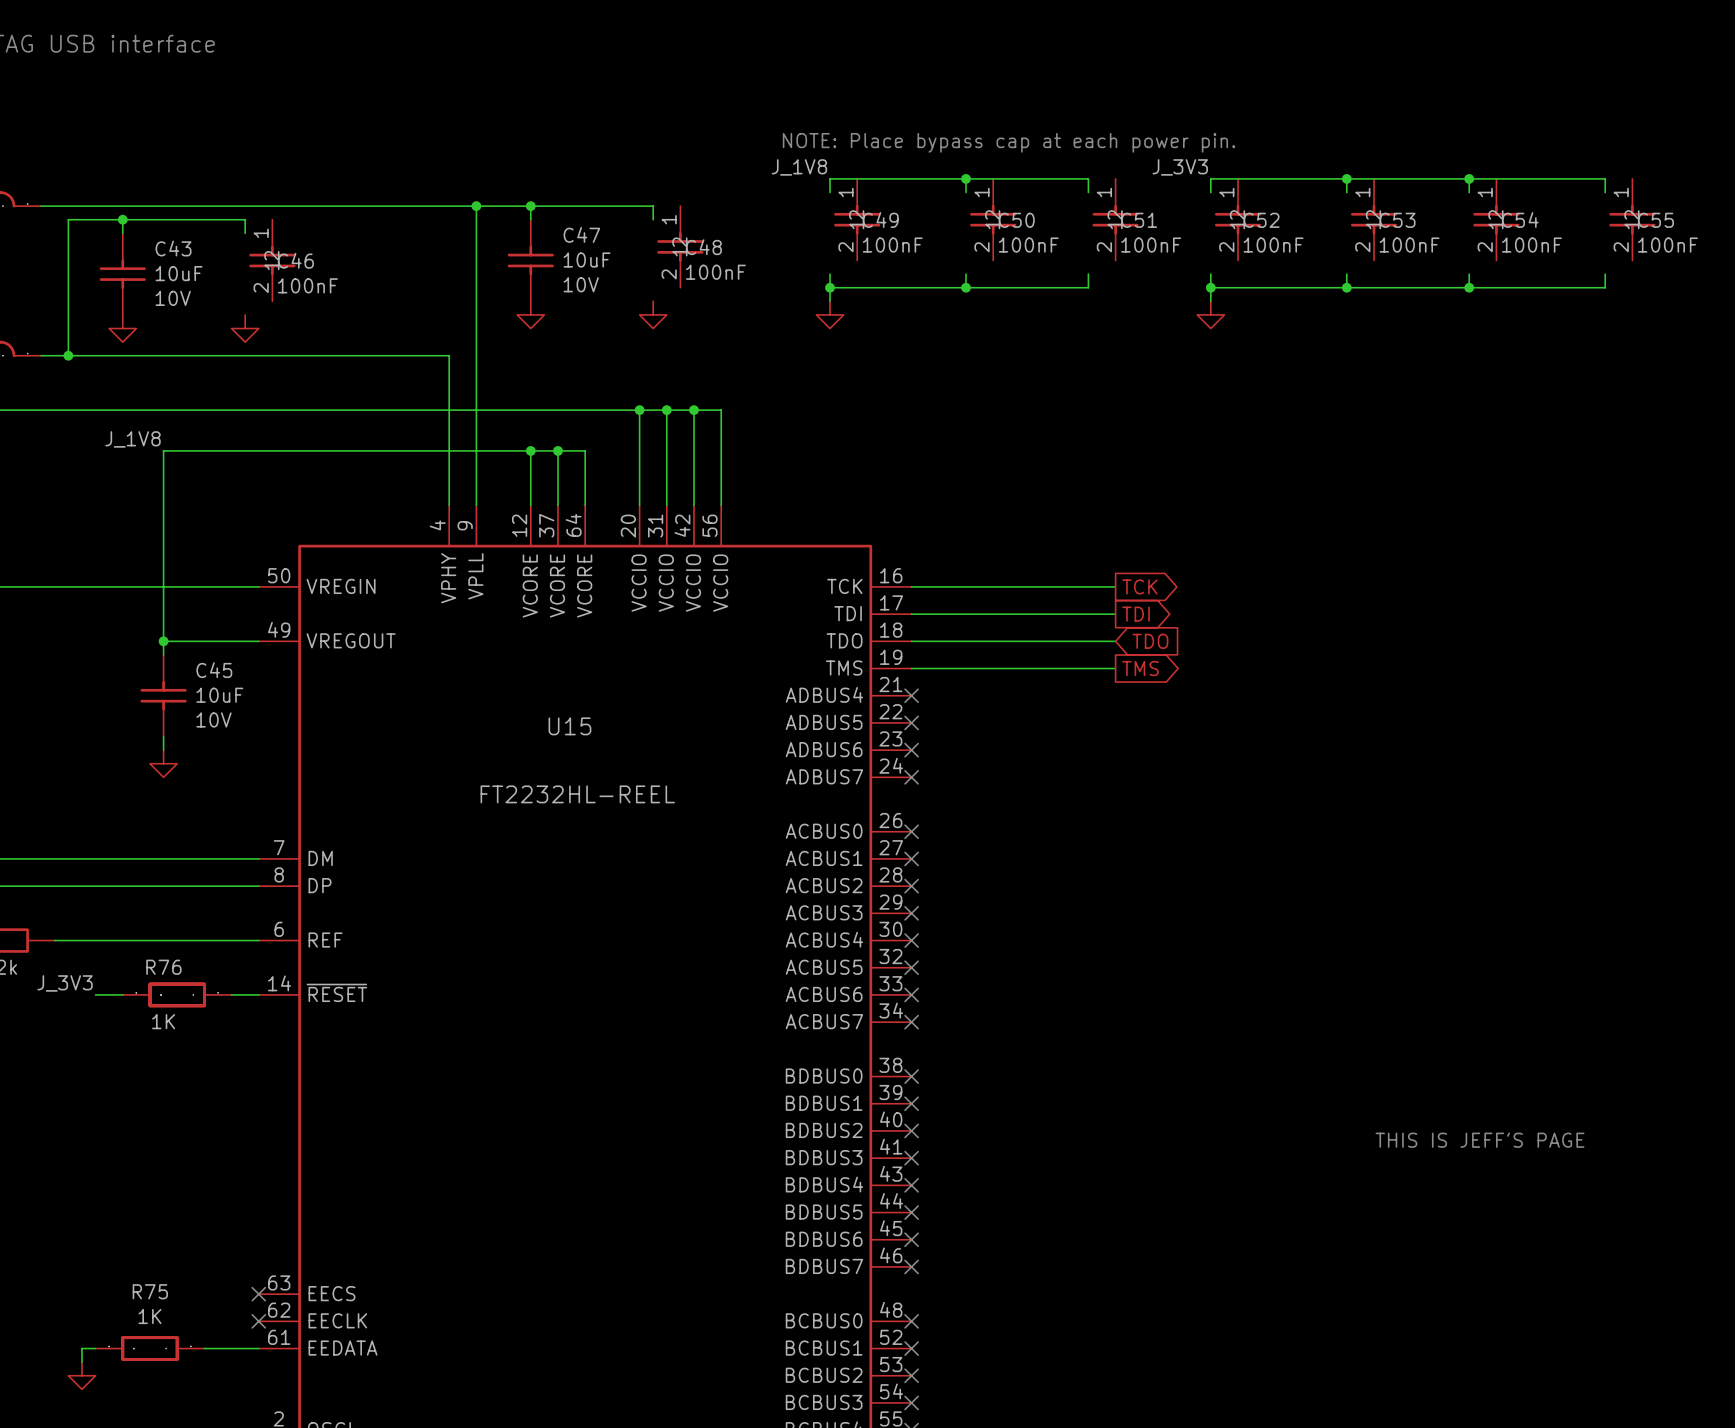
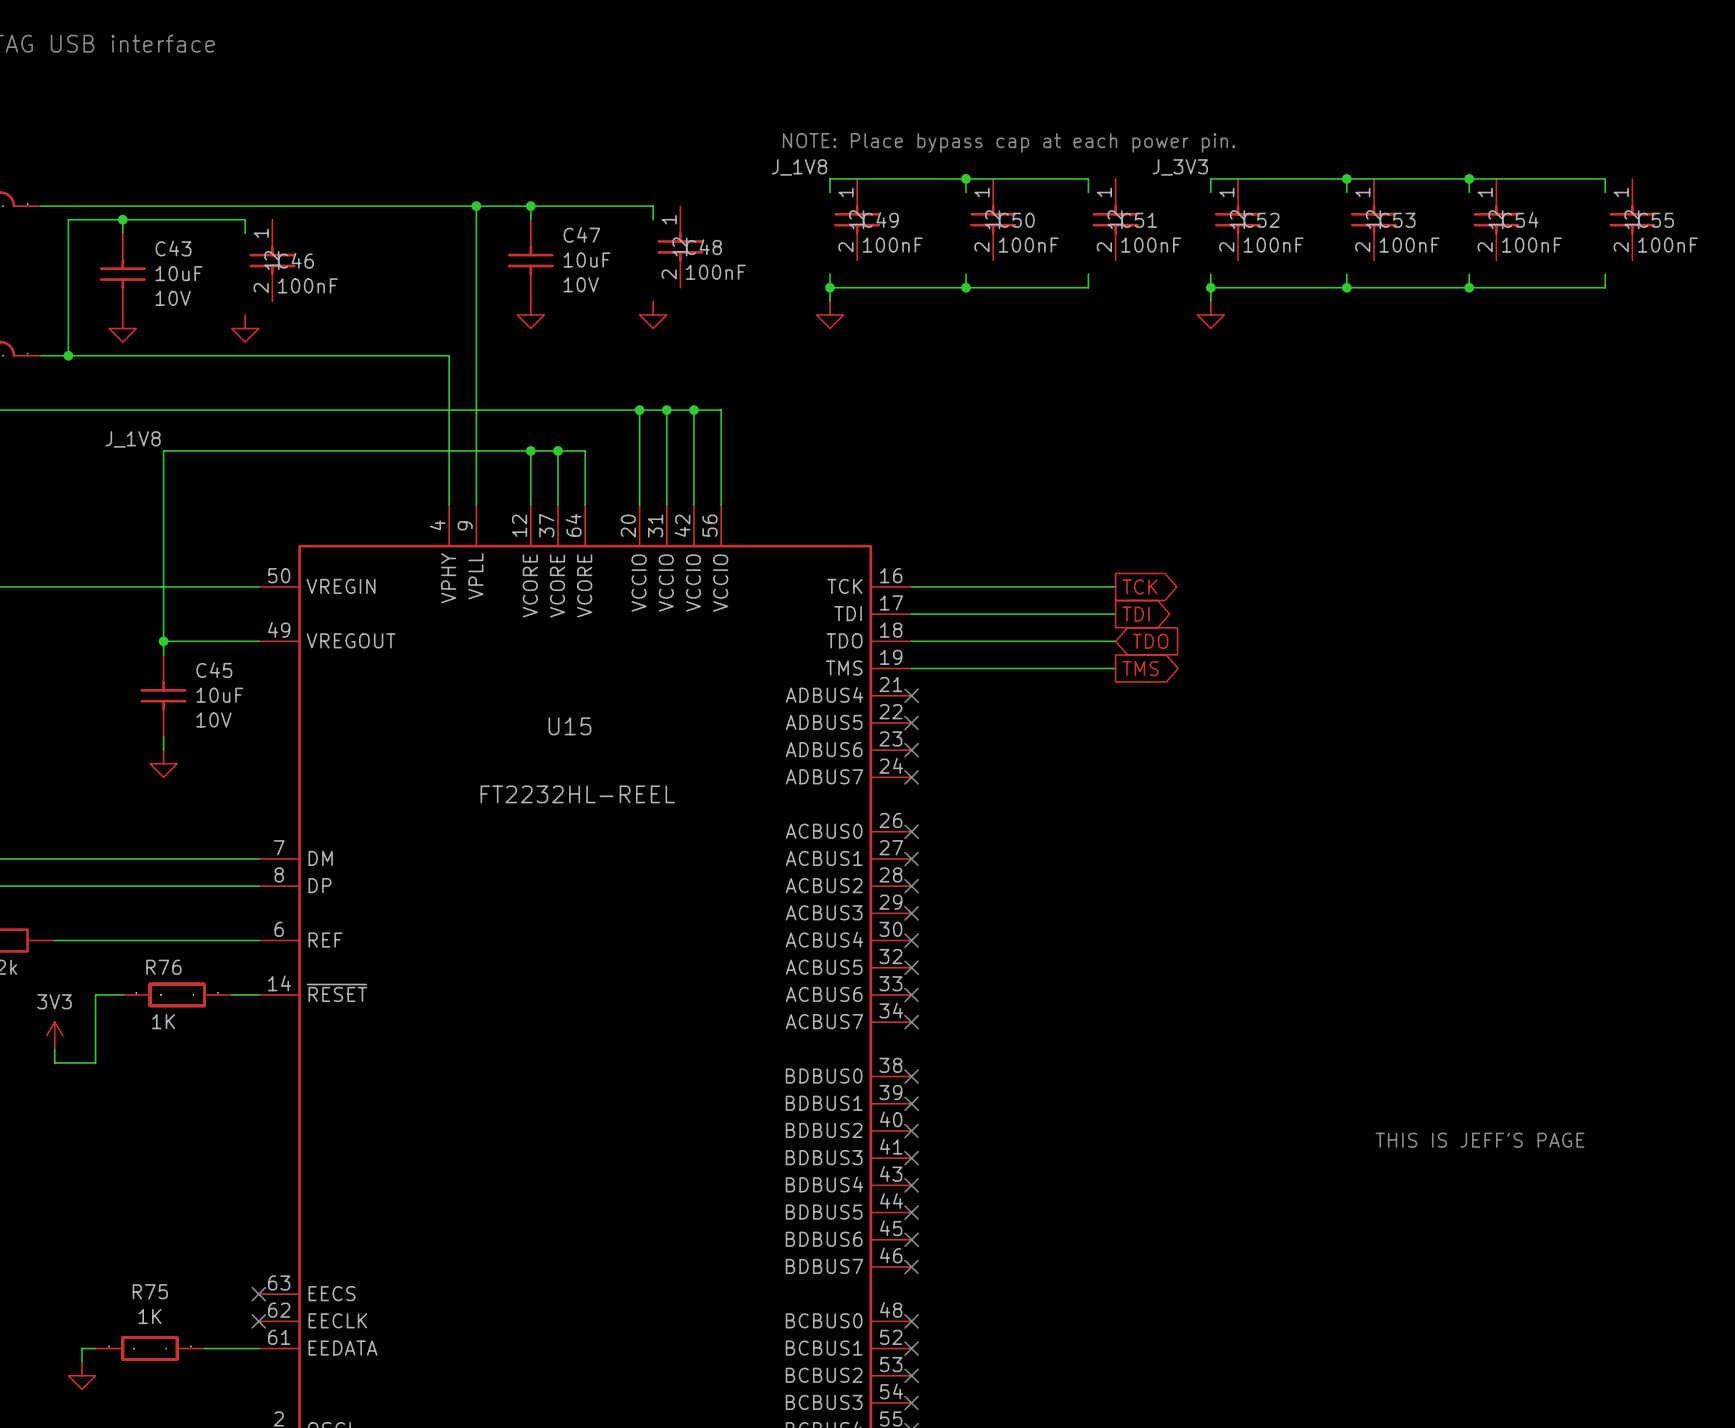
label: J_3V3 (65, 983) -> none
wire: none -> (95, 994) (95, 1062) (54, 1062) (54, 1049)
power symbol: none -> 3V3 (54, 1035)

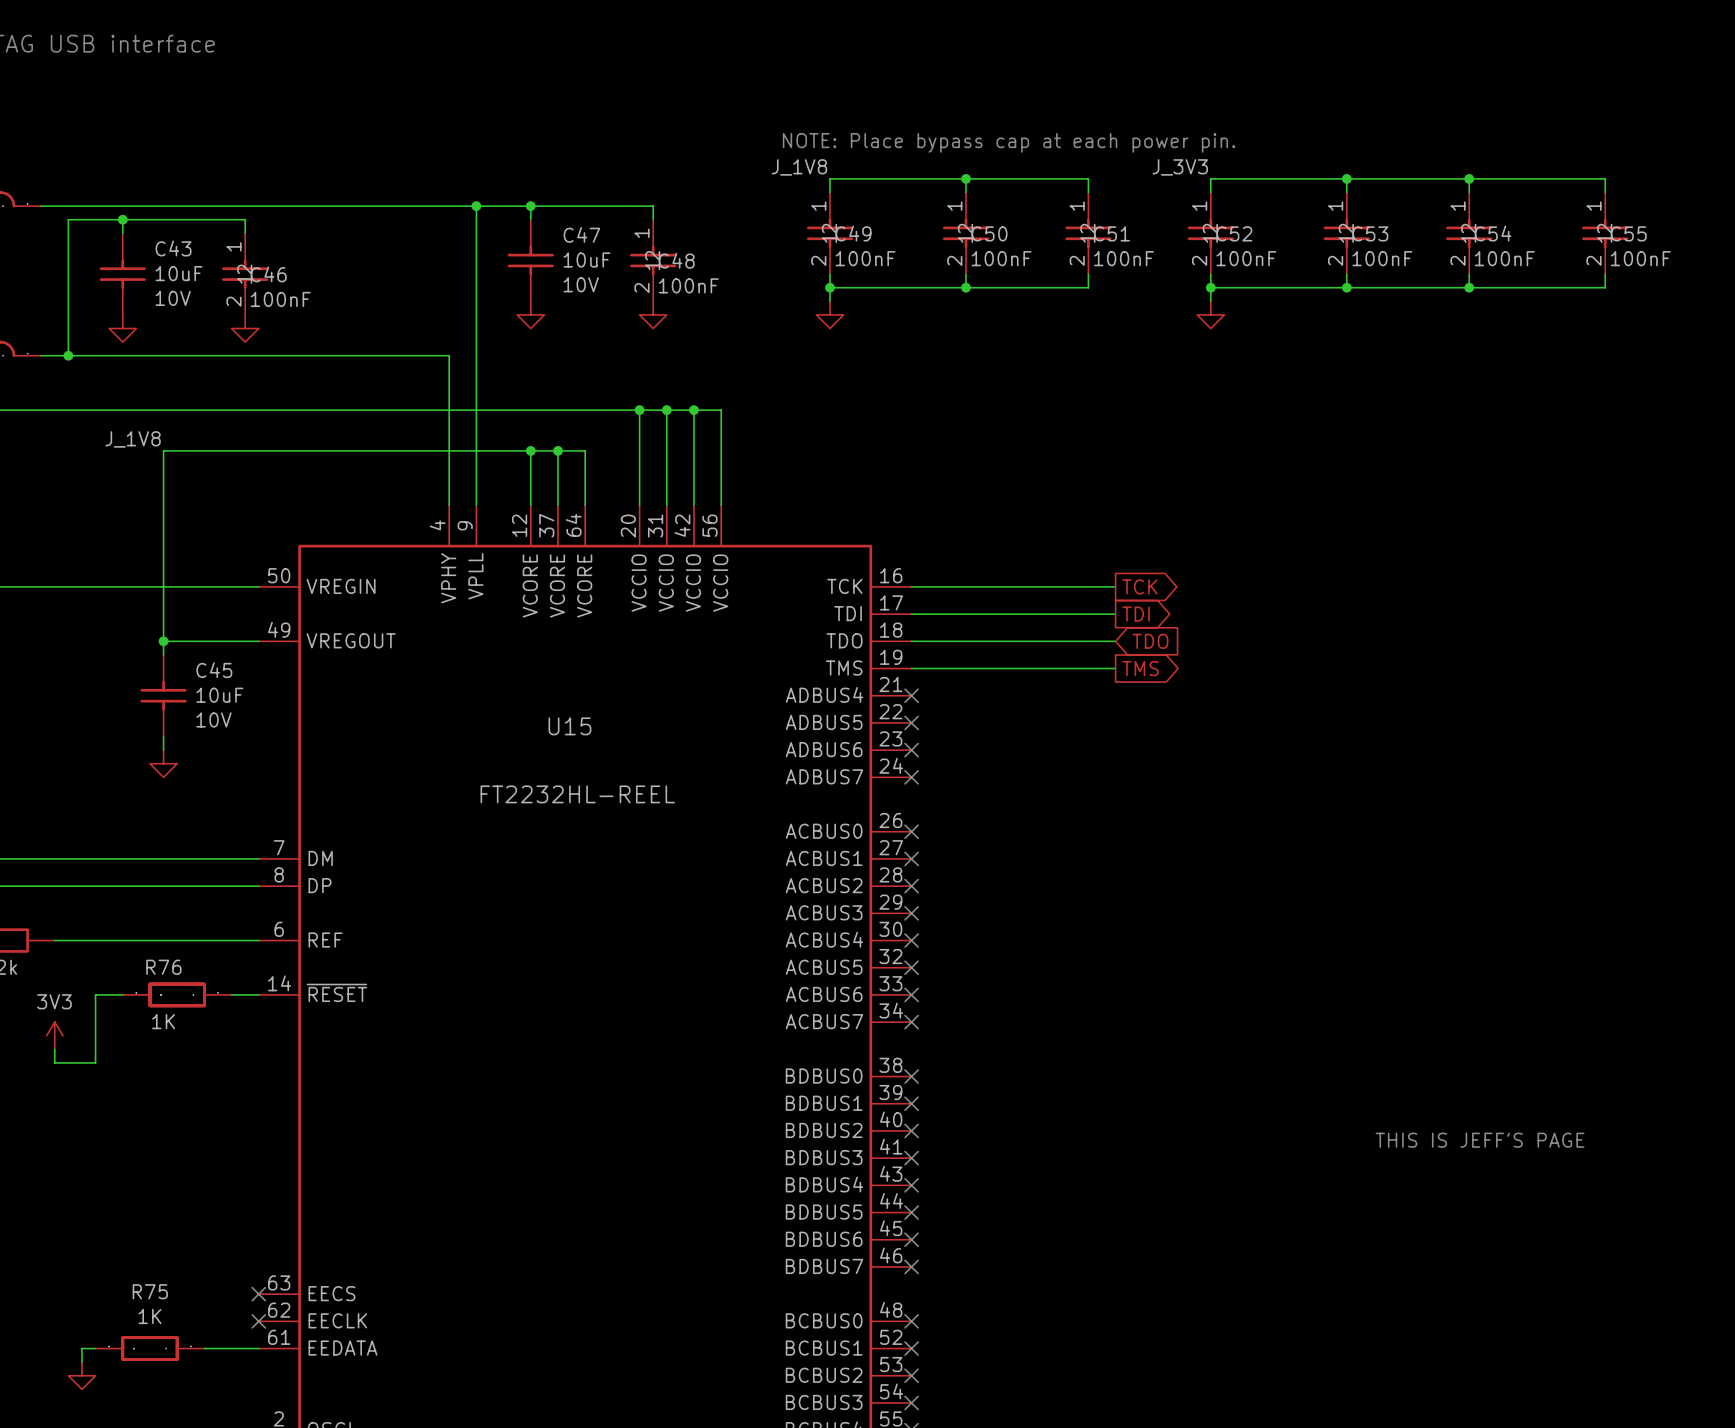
C49 position: (857, 219) -> (830, 233)
C50 position: (993, 219) -> (966, 233)
C51 position: (1115, 219) -> (1088, 233)
C52 position: (1238, 219) -> (1210, 233)
C53 position: (1374, 219) -> (1346, 233)
C54 position: (1496, 219) -> (1469, 233)
C55 position: (1632, 219) -> (1605, 233)
C48 position: (680, 246) -> (653, 260)
C46 position: (272, 260) -> (245, 274)

